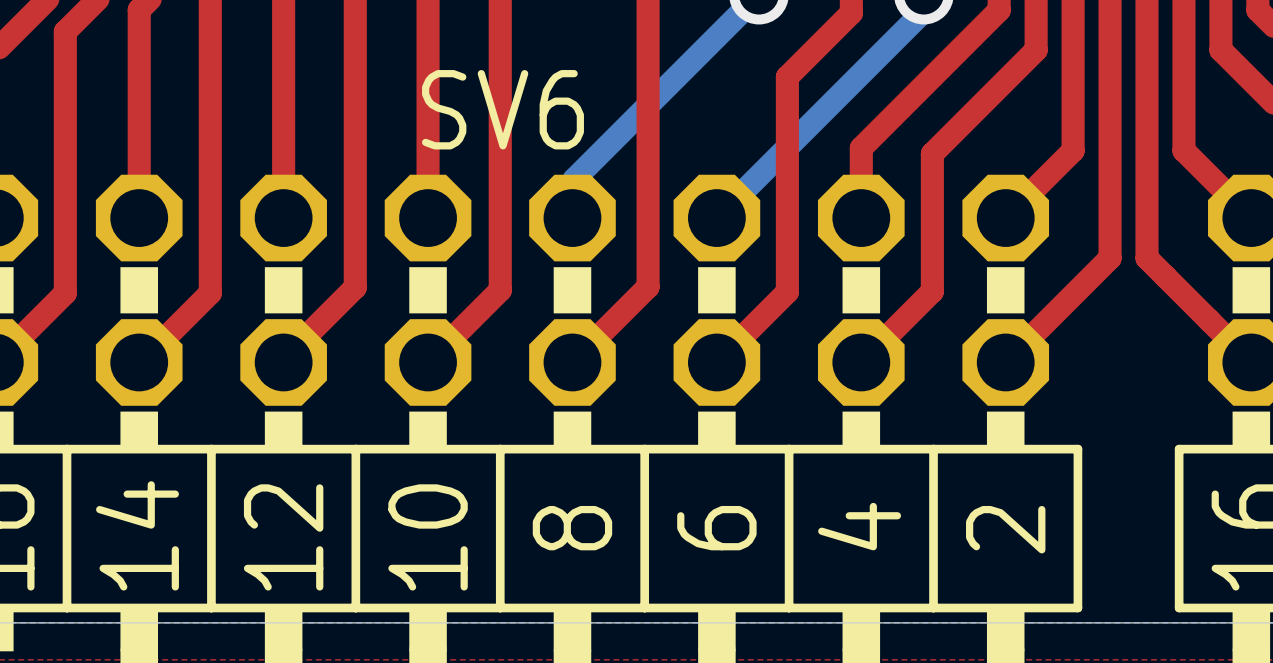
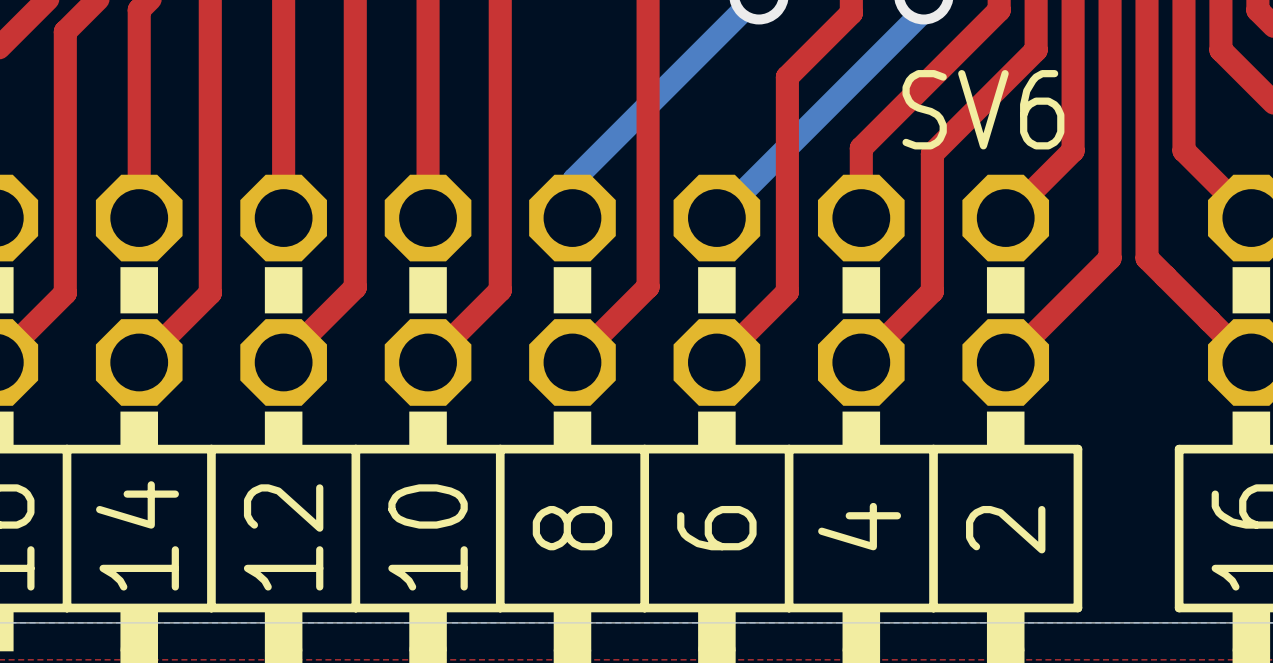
SV6 name position: SV6 (502, 109) -> SV6 (983, 109)

